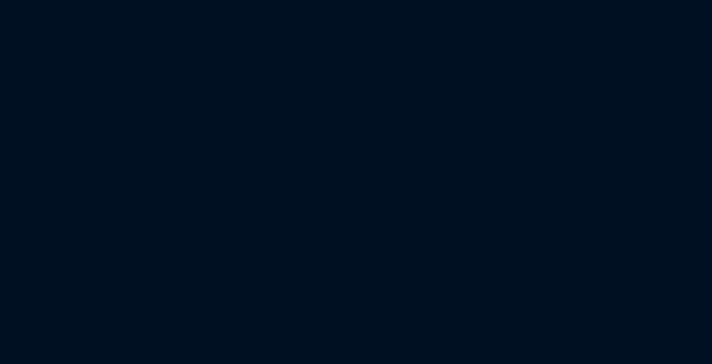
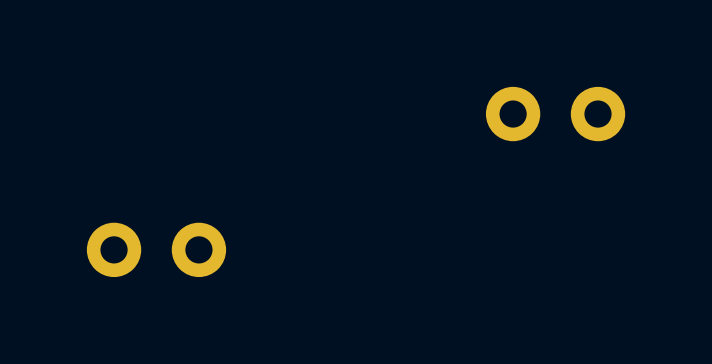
part: none -> (555, 114)
part: none -> (156, 249)

